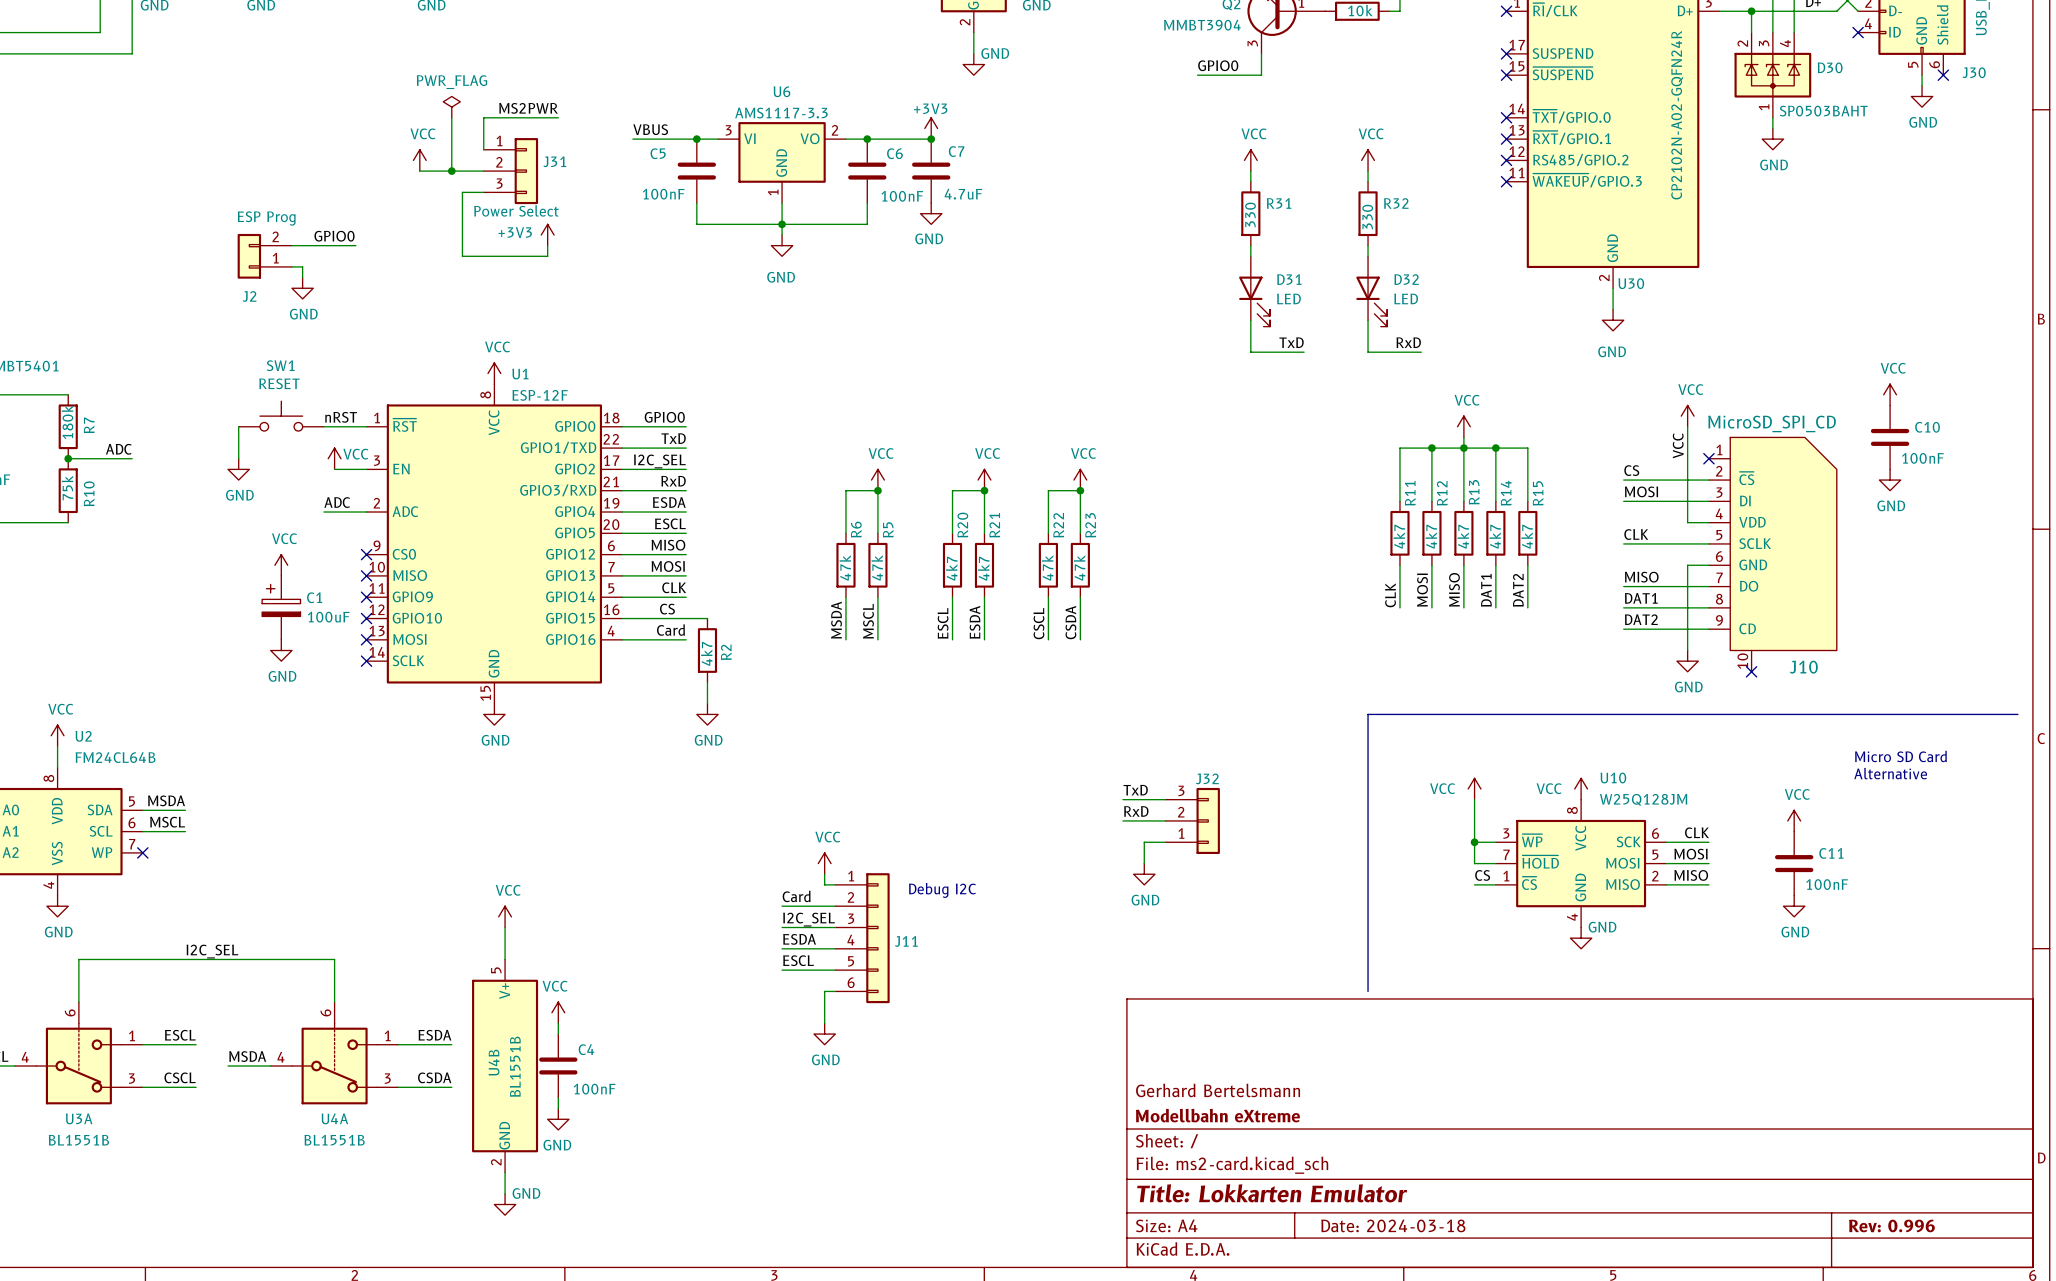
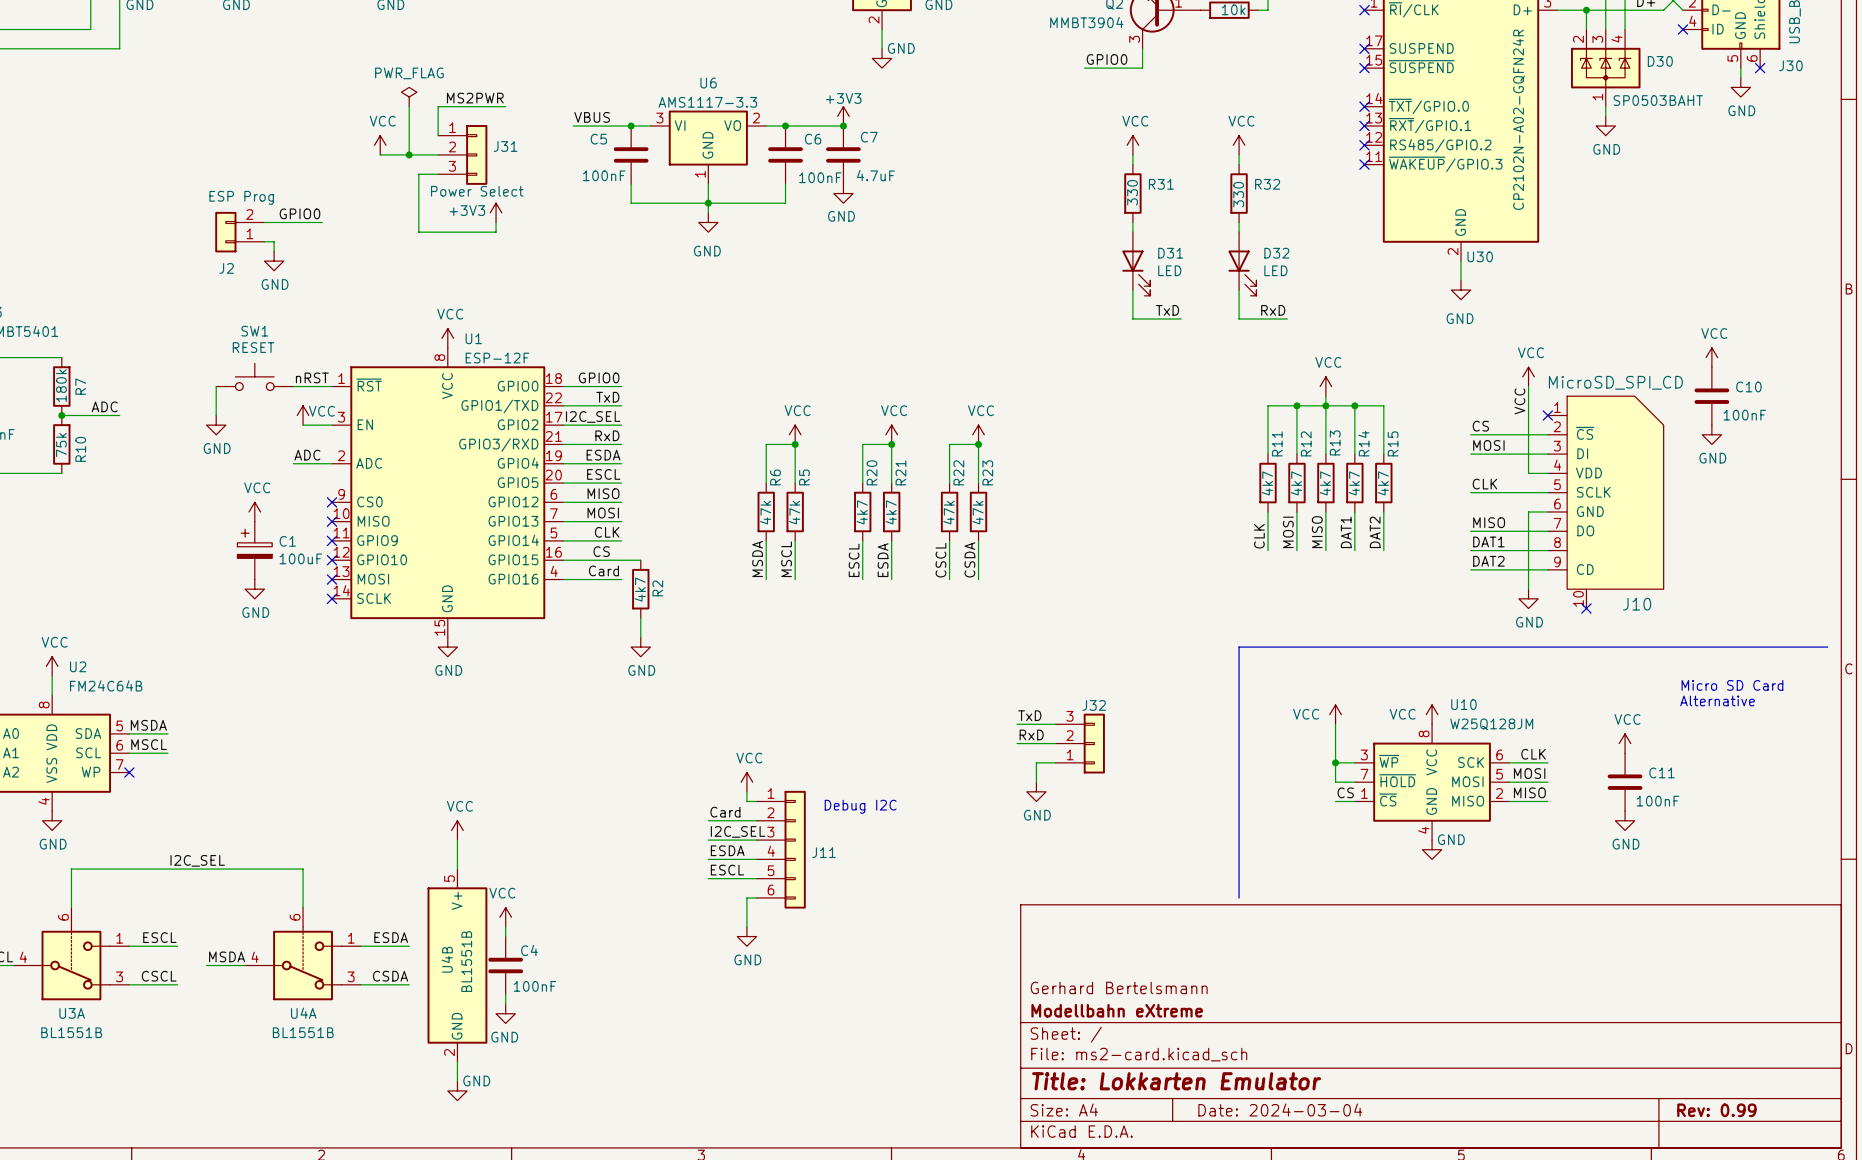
U2 value: FM24CL64B (115, 757) -> FM24C64B (106, 685)
title block: Date: 2024-03-18 (1393, 1225) -> Date: 2024-03-04 (1280, 1110)
title block: Rev: 0.996 (1891, 1225) -> Rev: 0.99 (1716, 1110)

